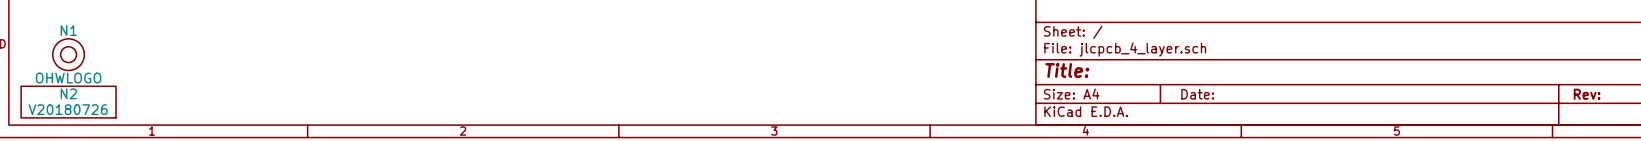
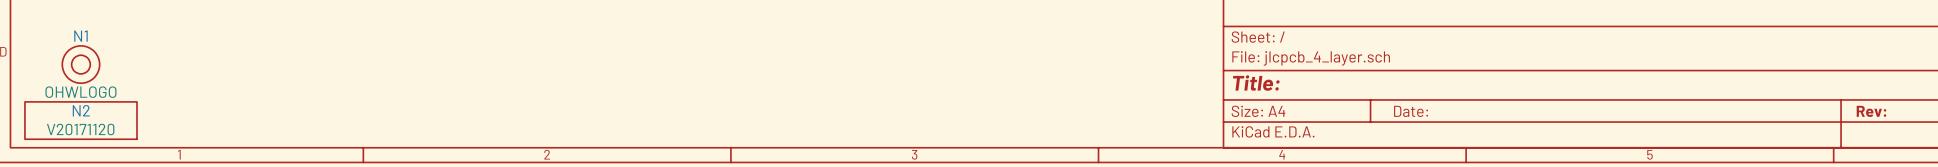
N2 value: V20180726 (68, 109) -> V20171120 (80, 129)

